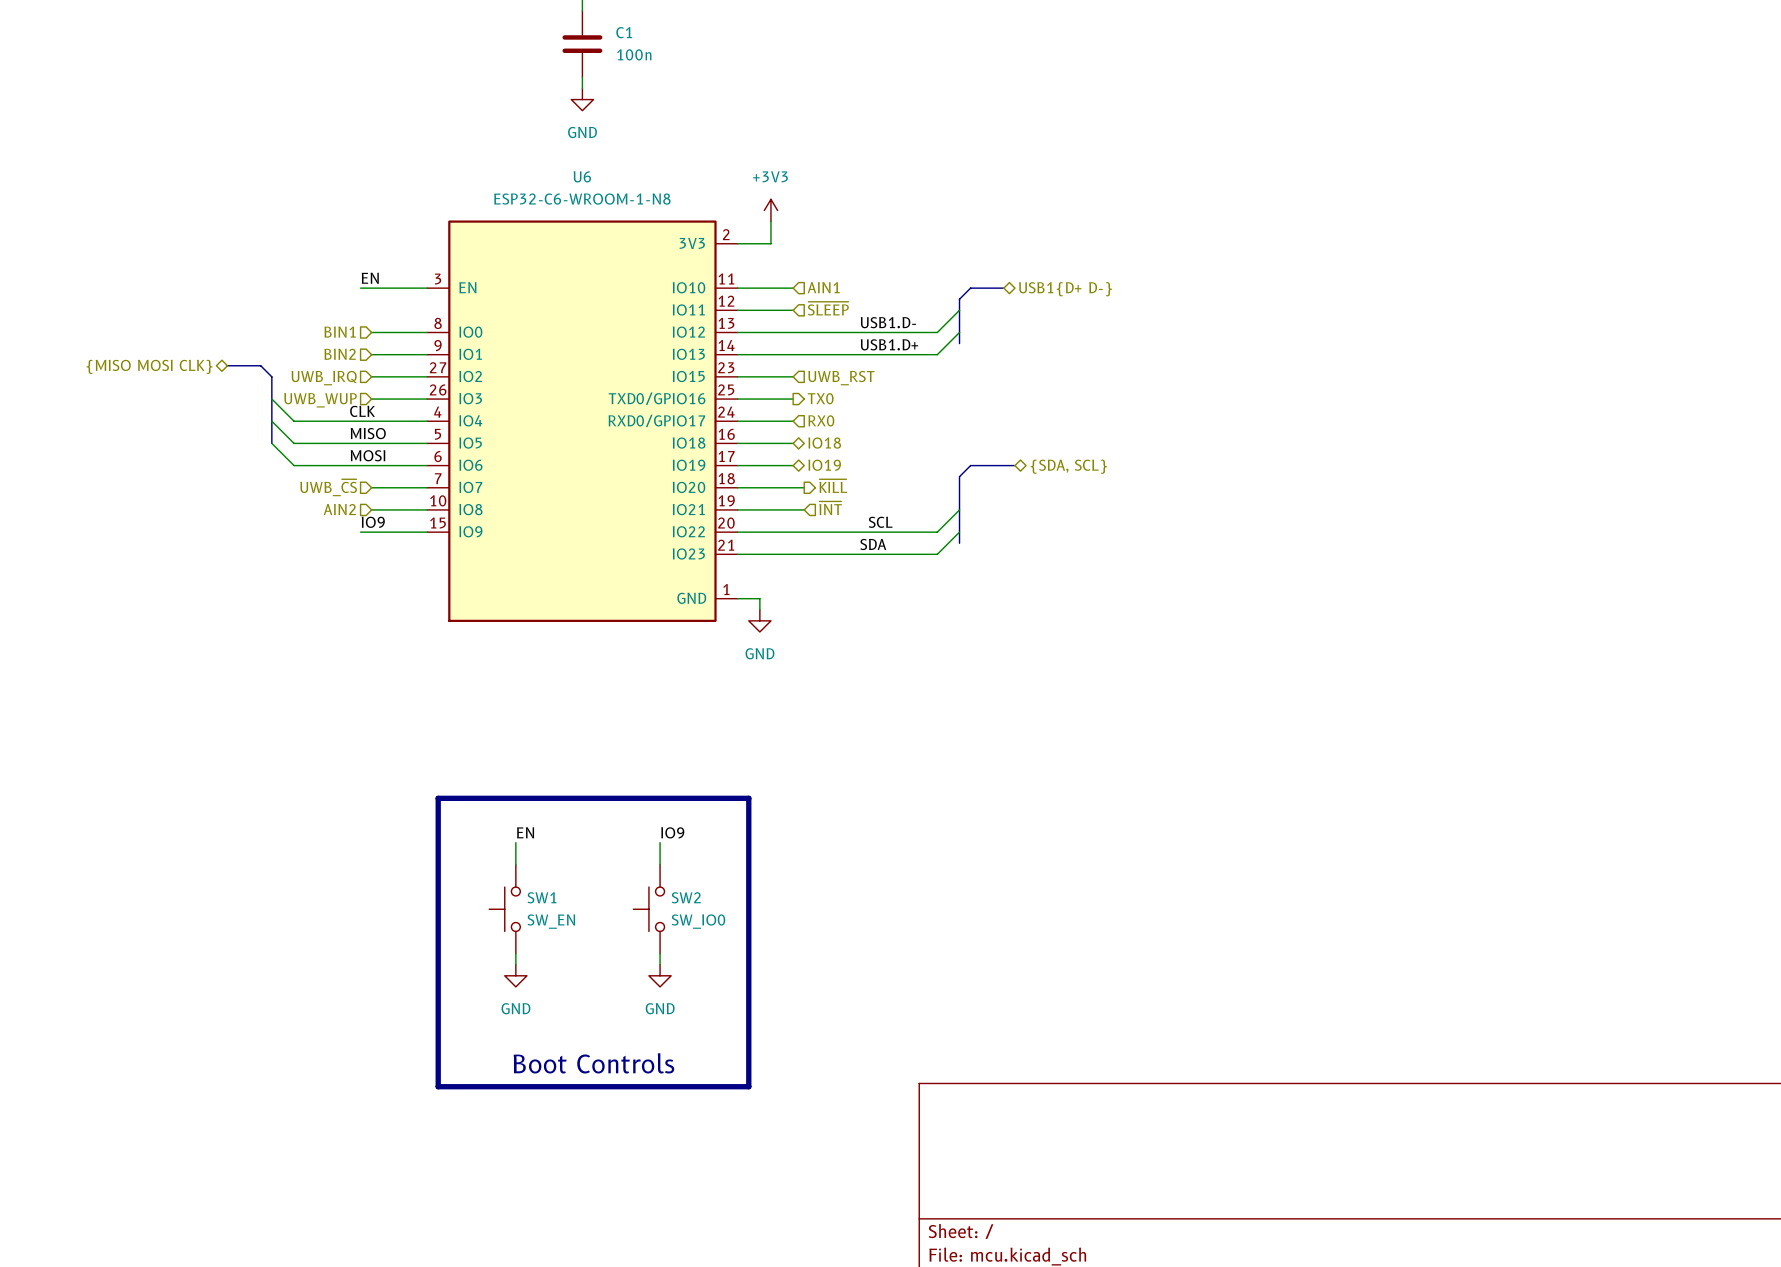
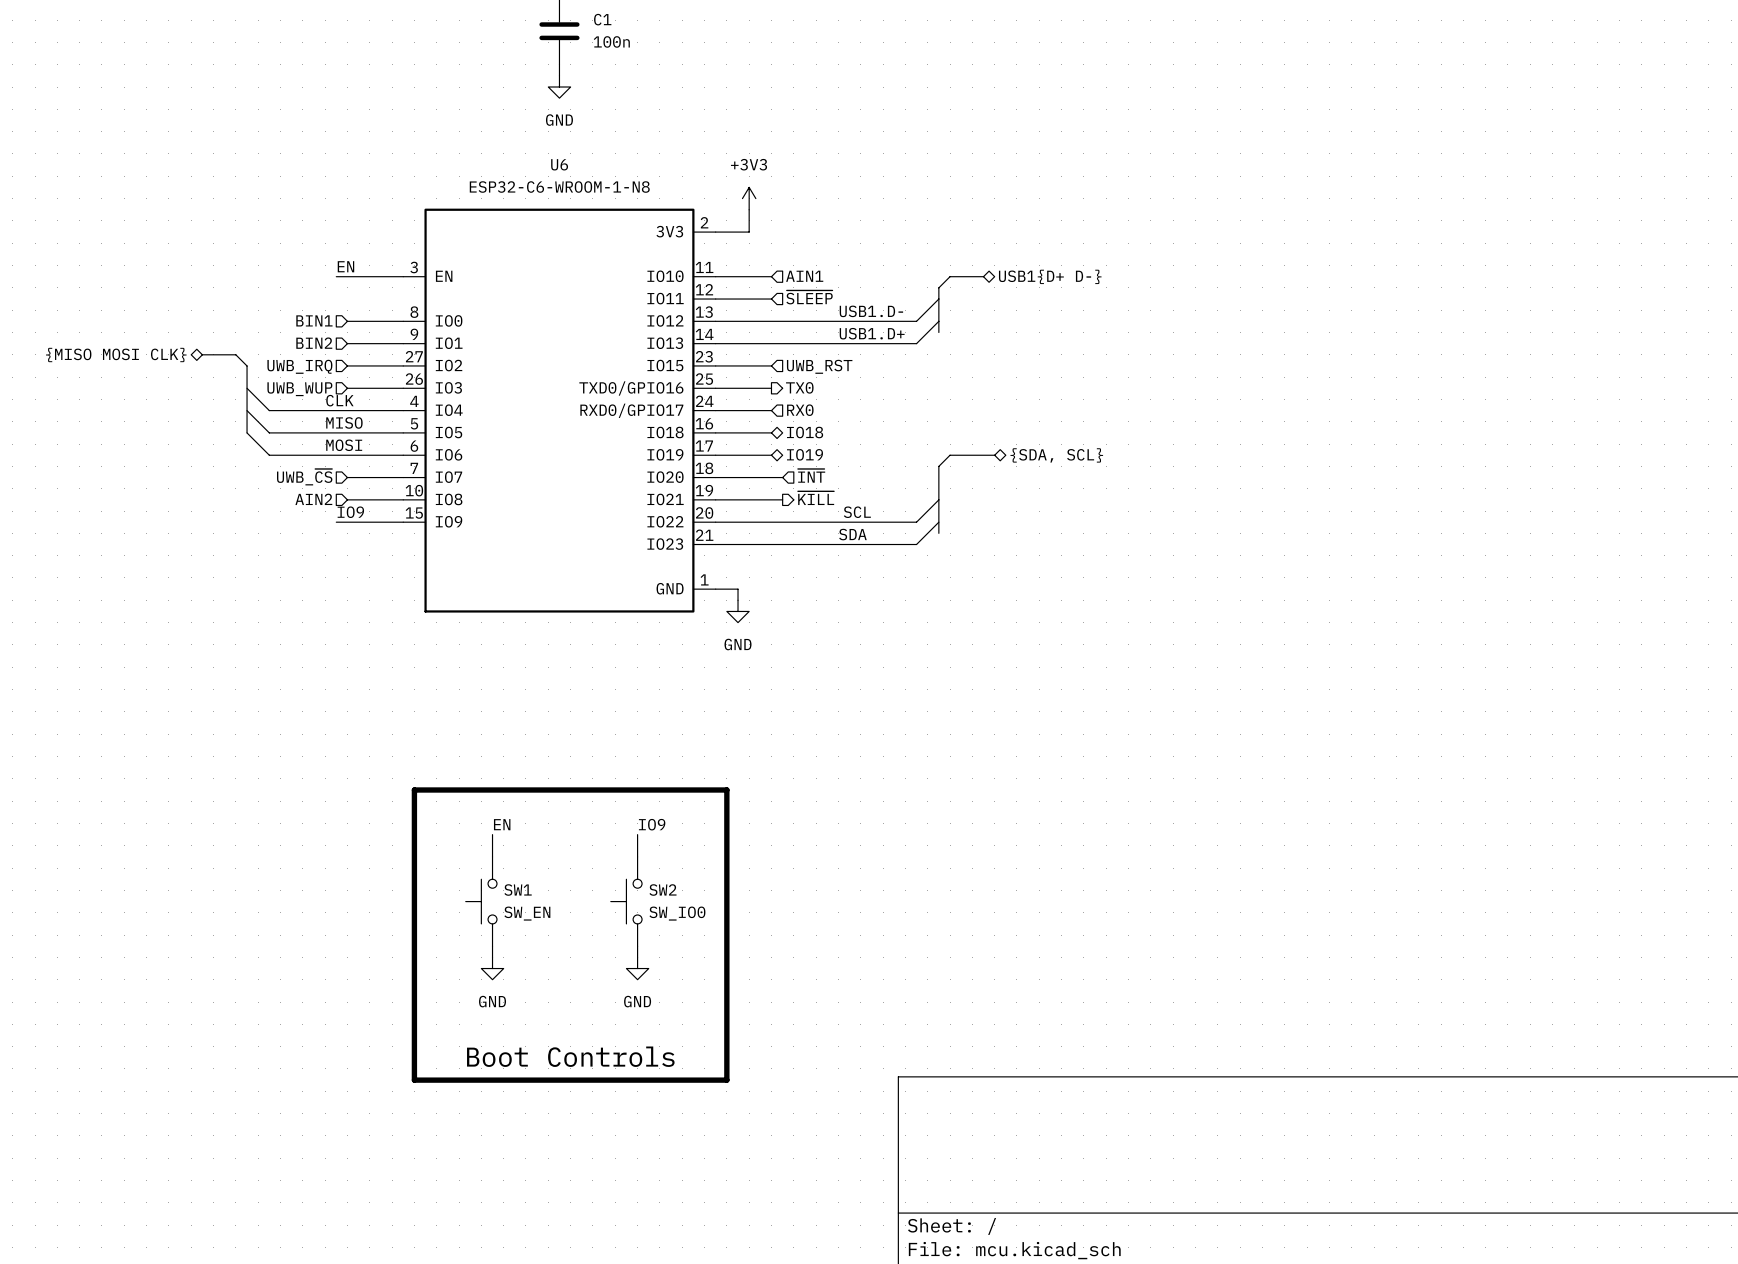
hierarchical label shape: output (833, 486) -> input (811, 475)
hierarchical label: ~{KILL} (833, 486) -> ~{INT} (811, 475)
hierarchical label shape: input (830, 508) -> output (816, 498)
hierarchical label: ~{INT} (830, 508) -> ~{KILL} (816, 498)

